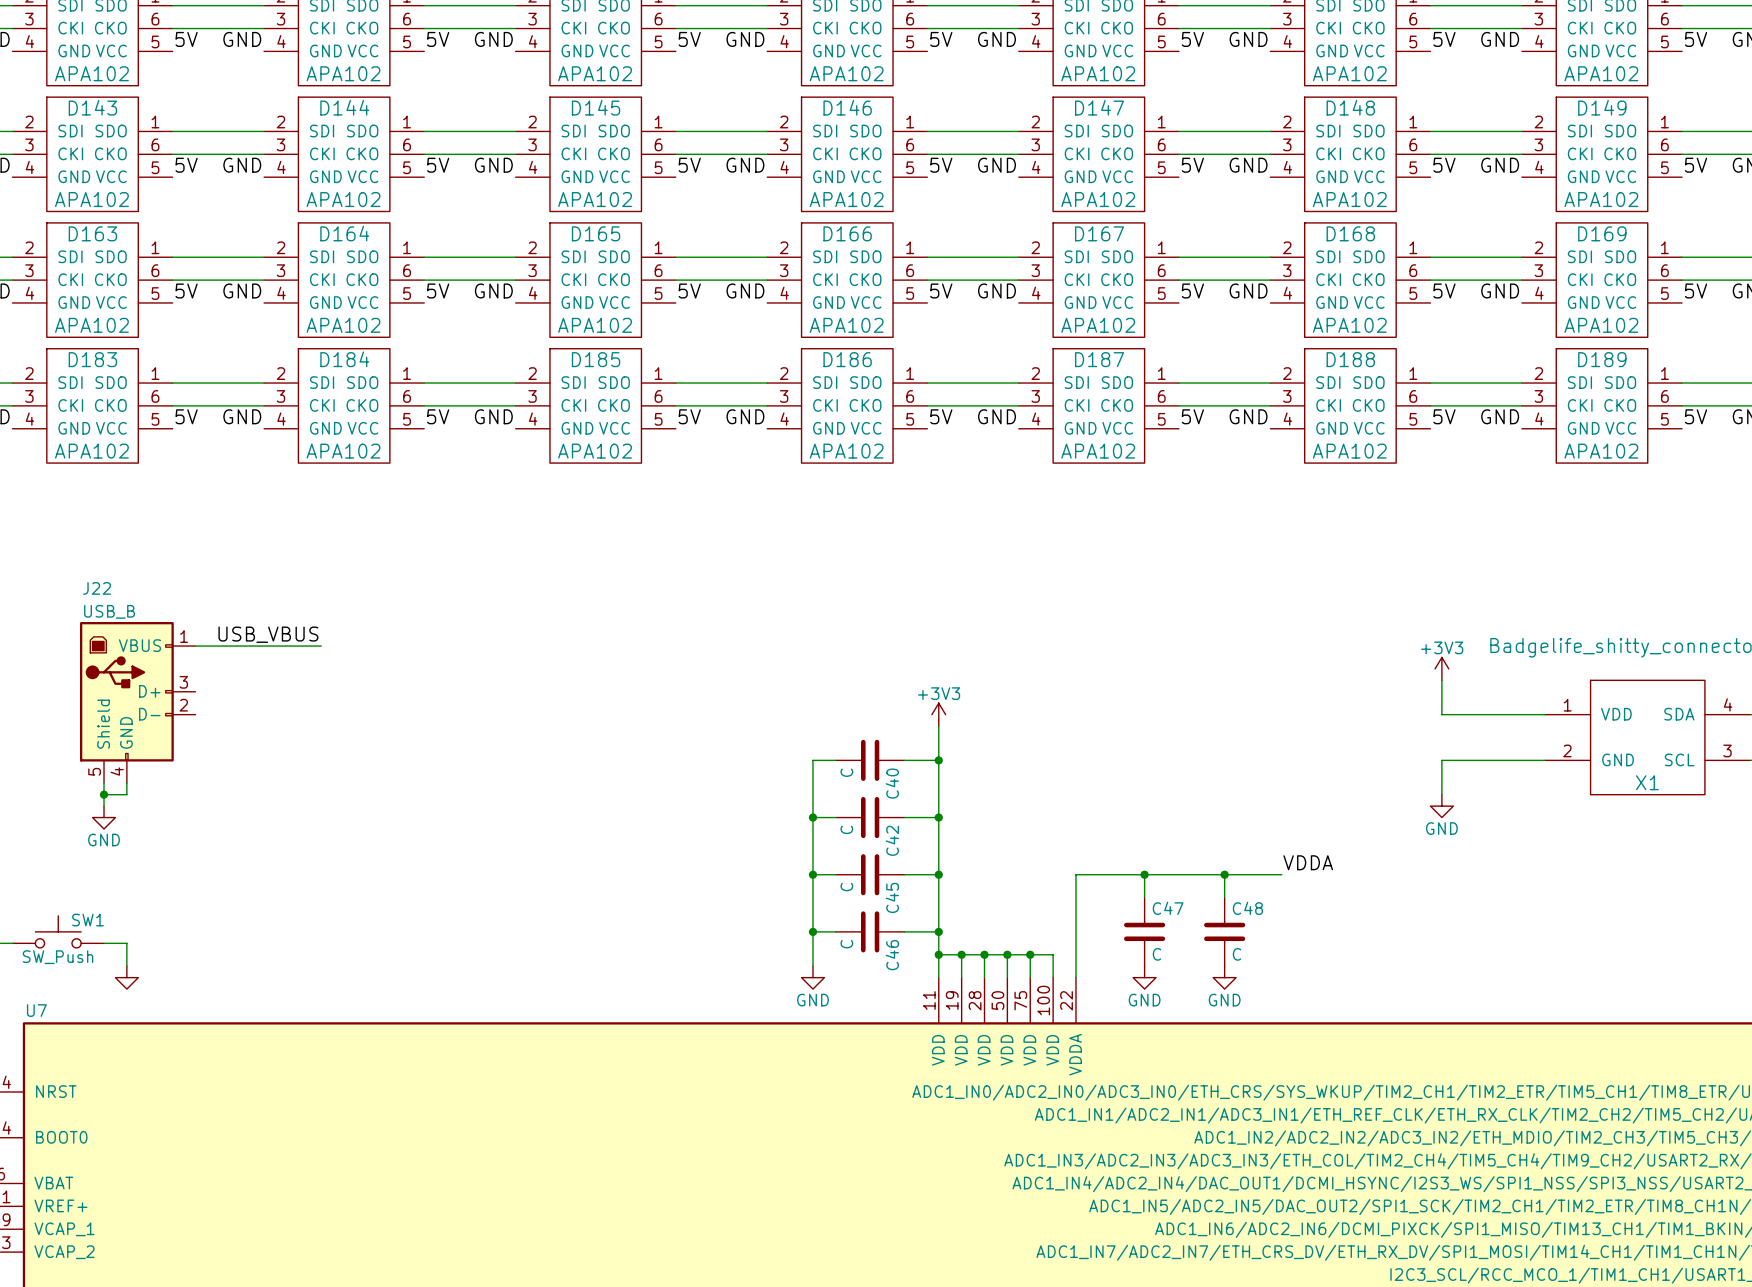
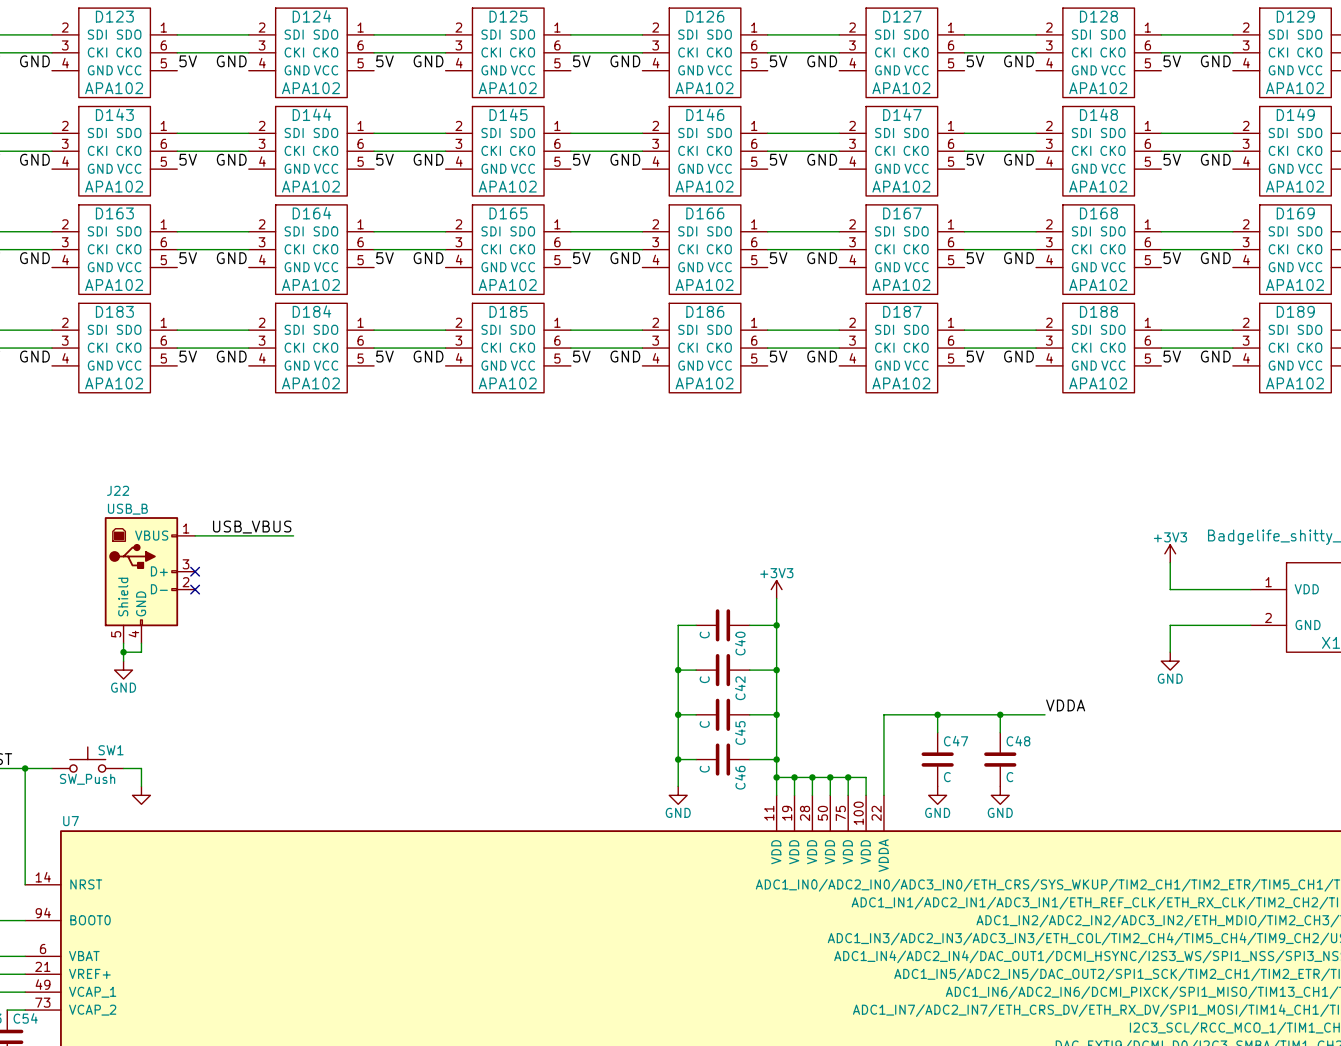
no-connect mark: none -> (195, 571)
no-connect mark: none -> (195, 589)

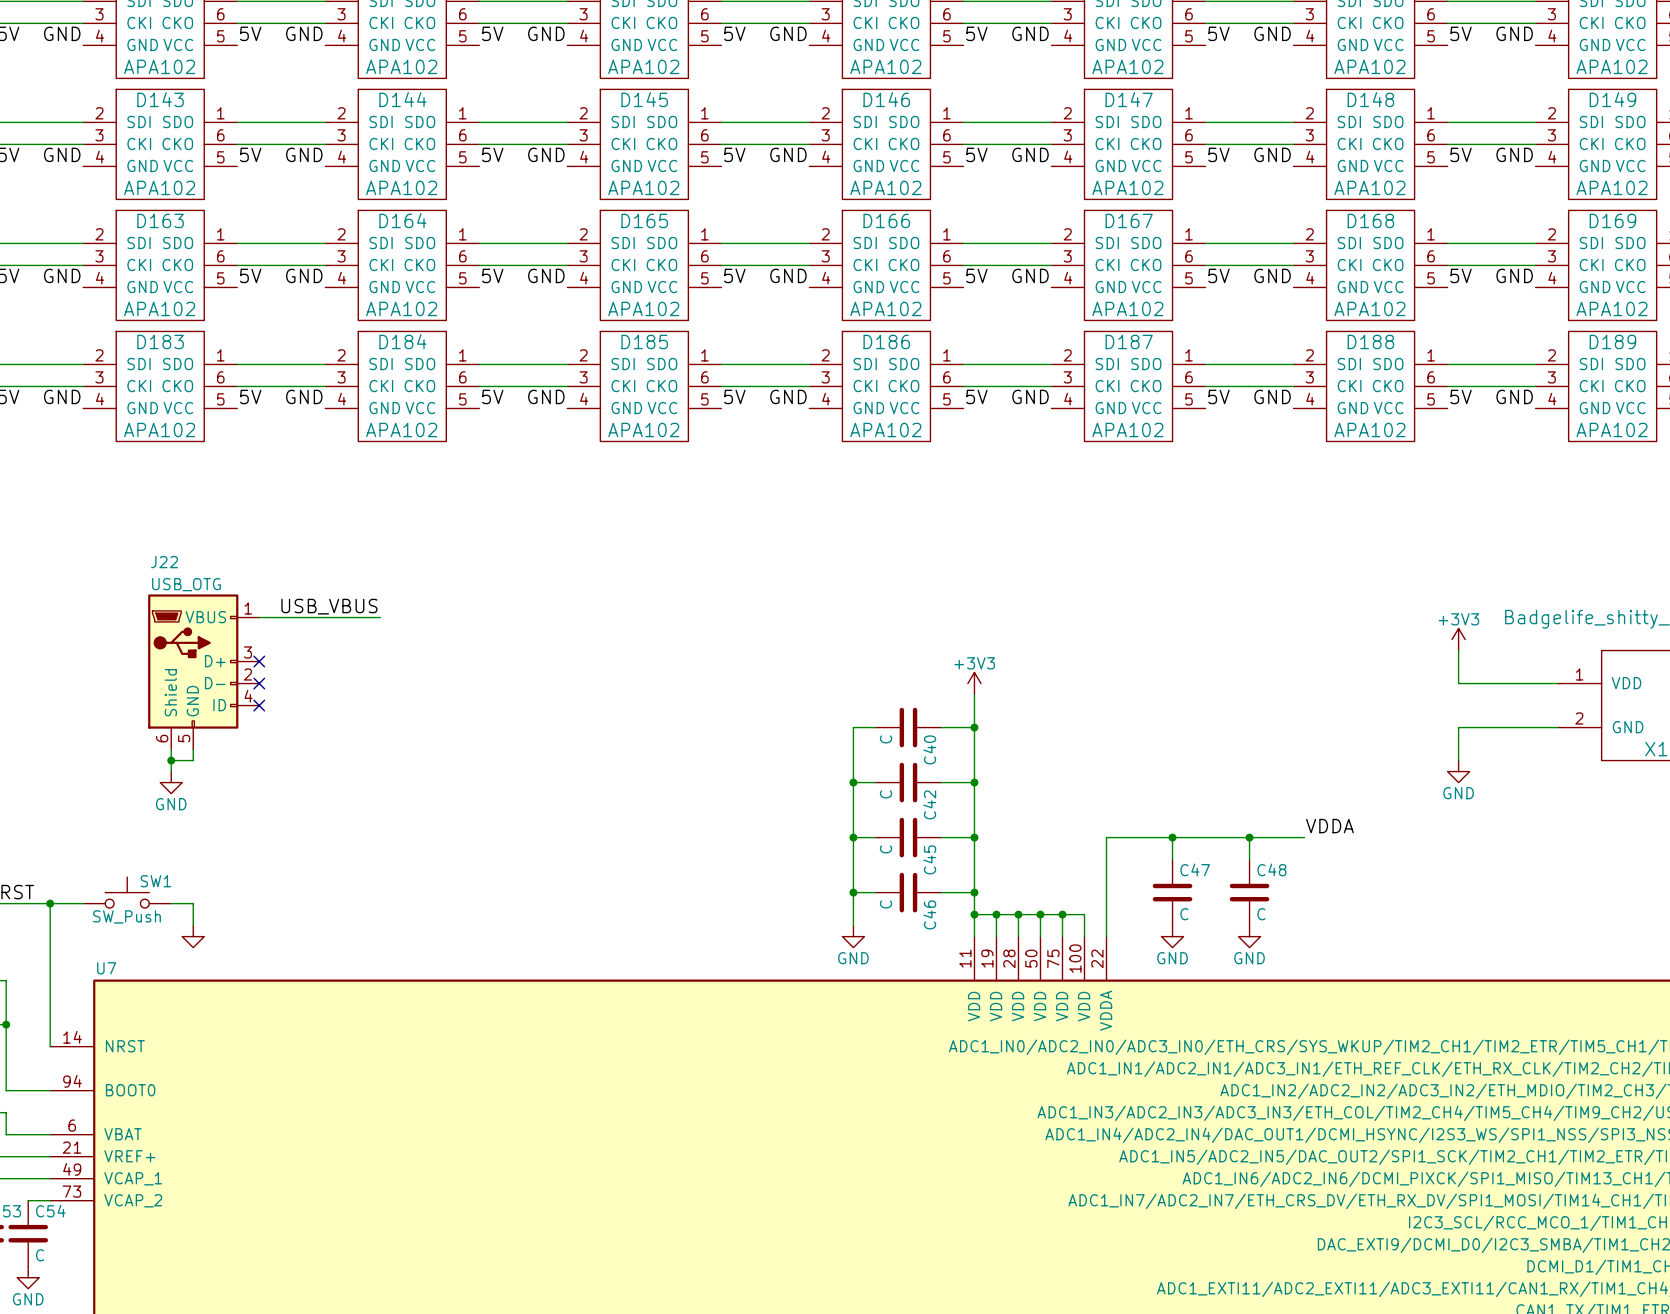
J22 value: USB_B (127, 509) -> USB_OTG (186, 584)
J22 symbol: [104, 517, 196, 644] -> [148, 594, 260, 750]
no-connect mark: none -> (259, 705)

